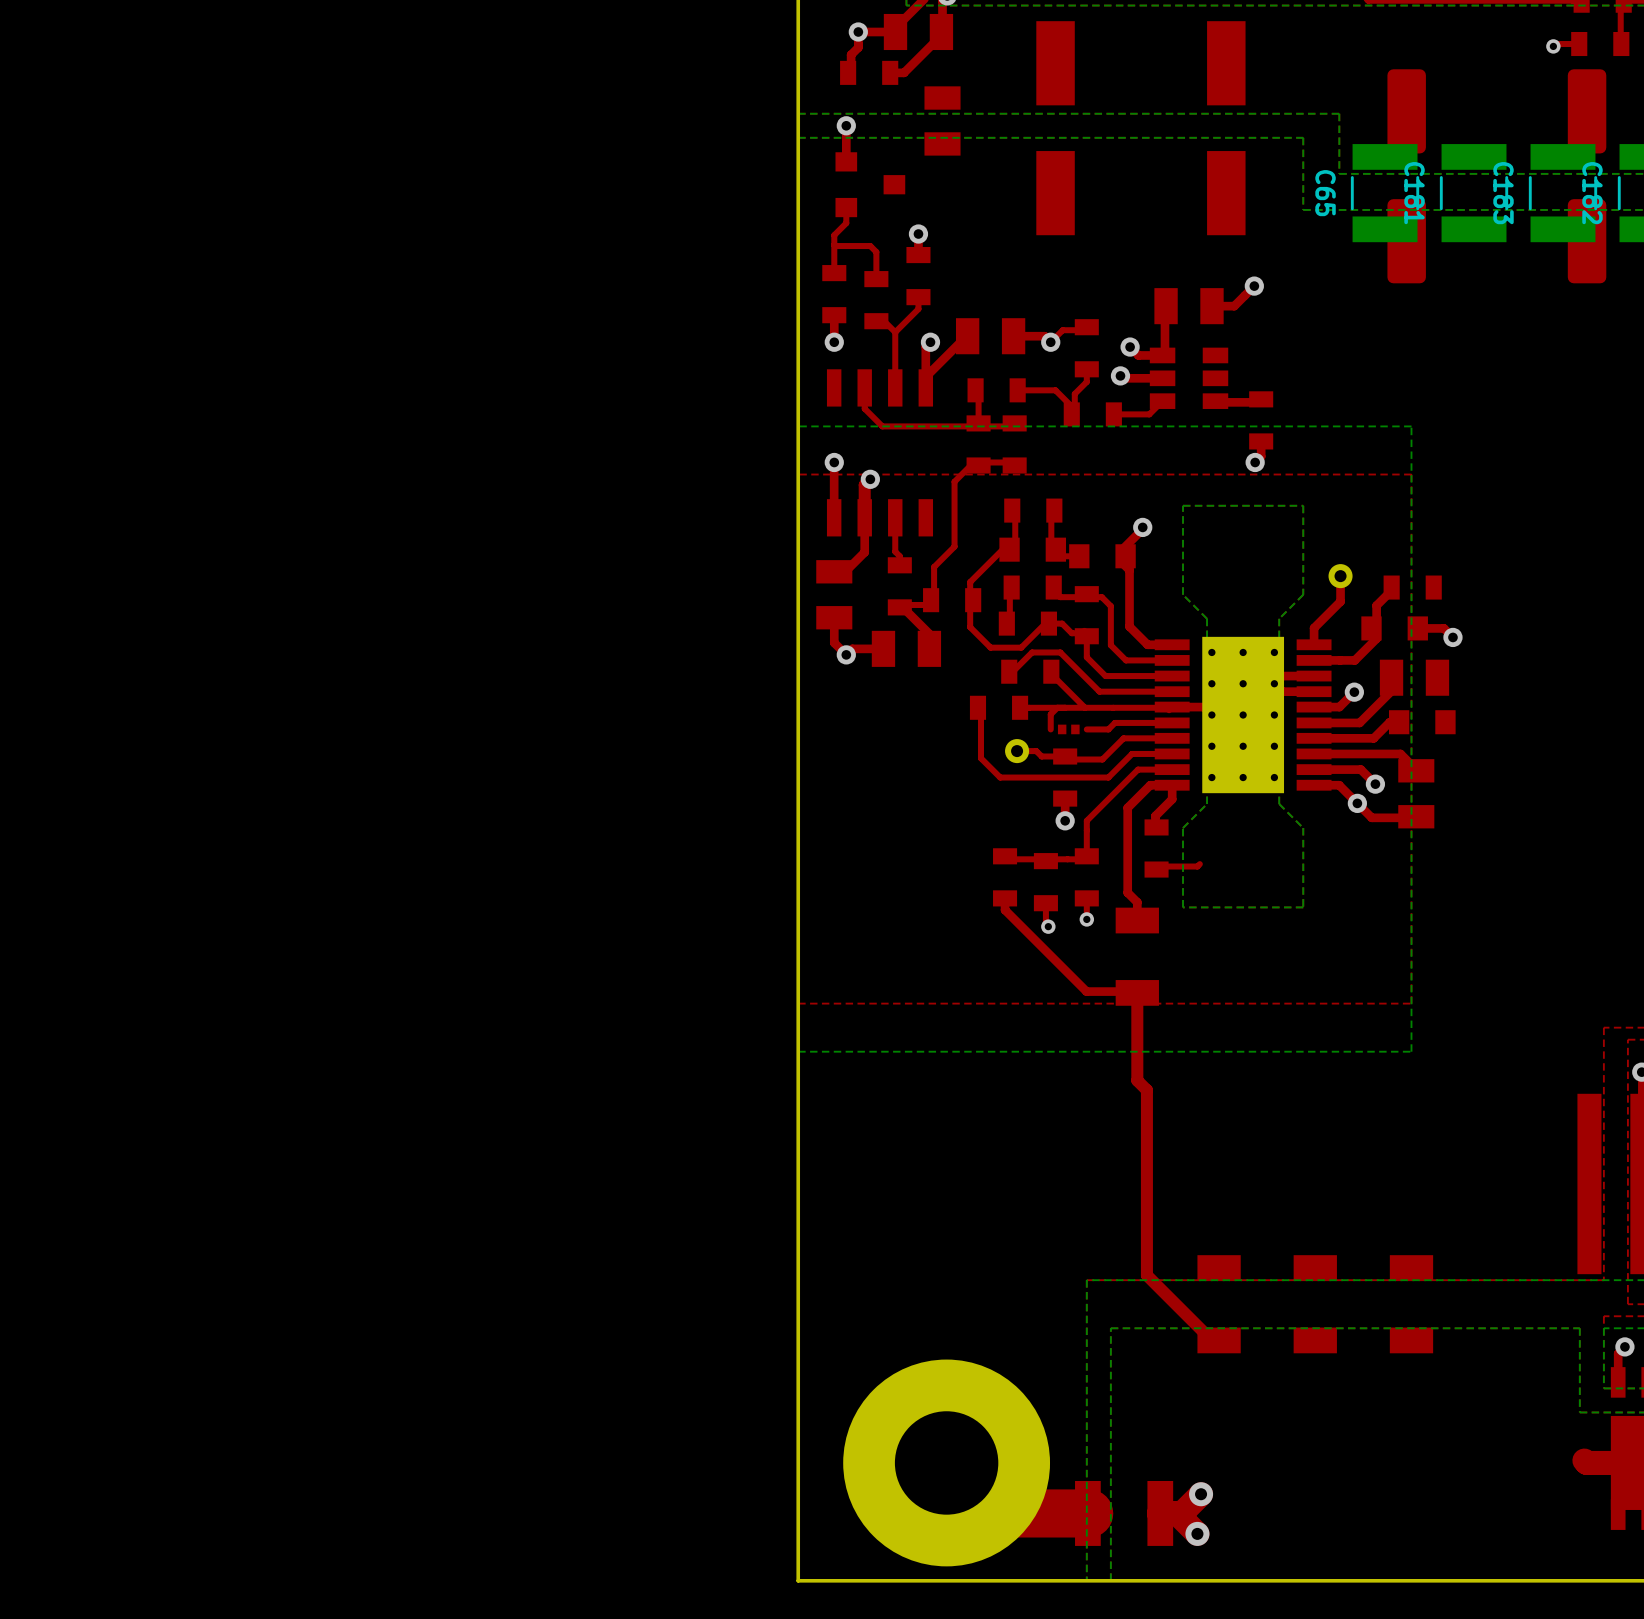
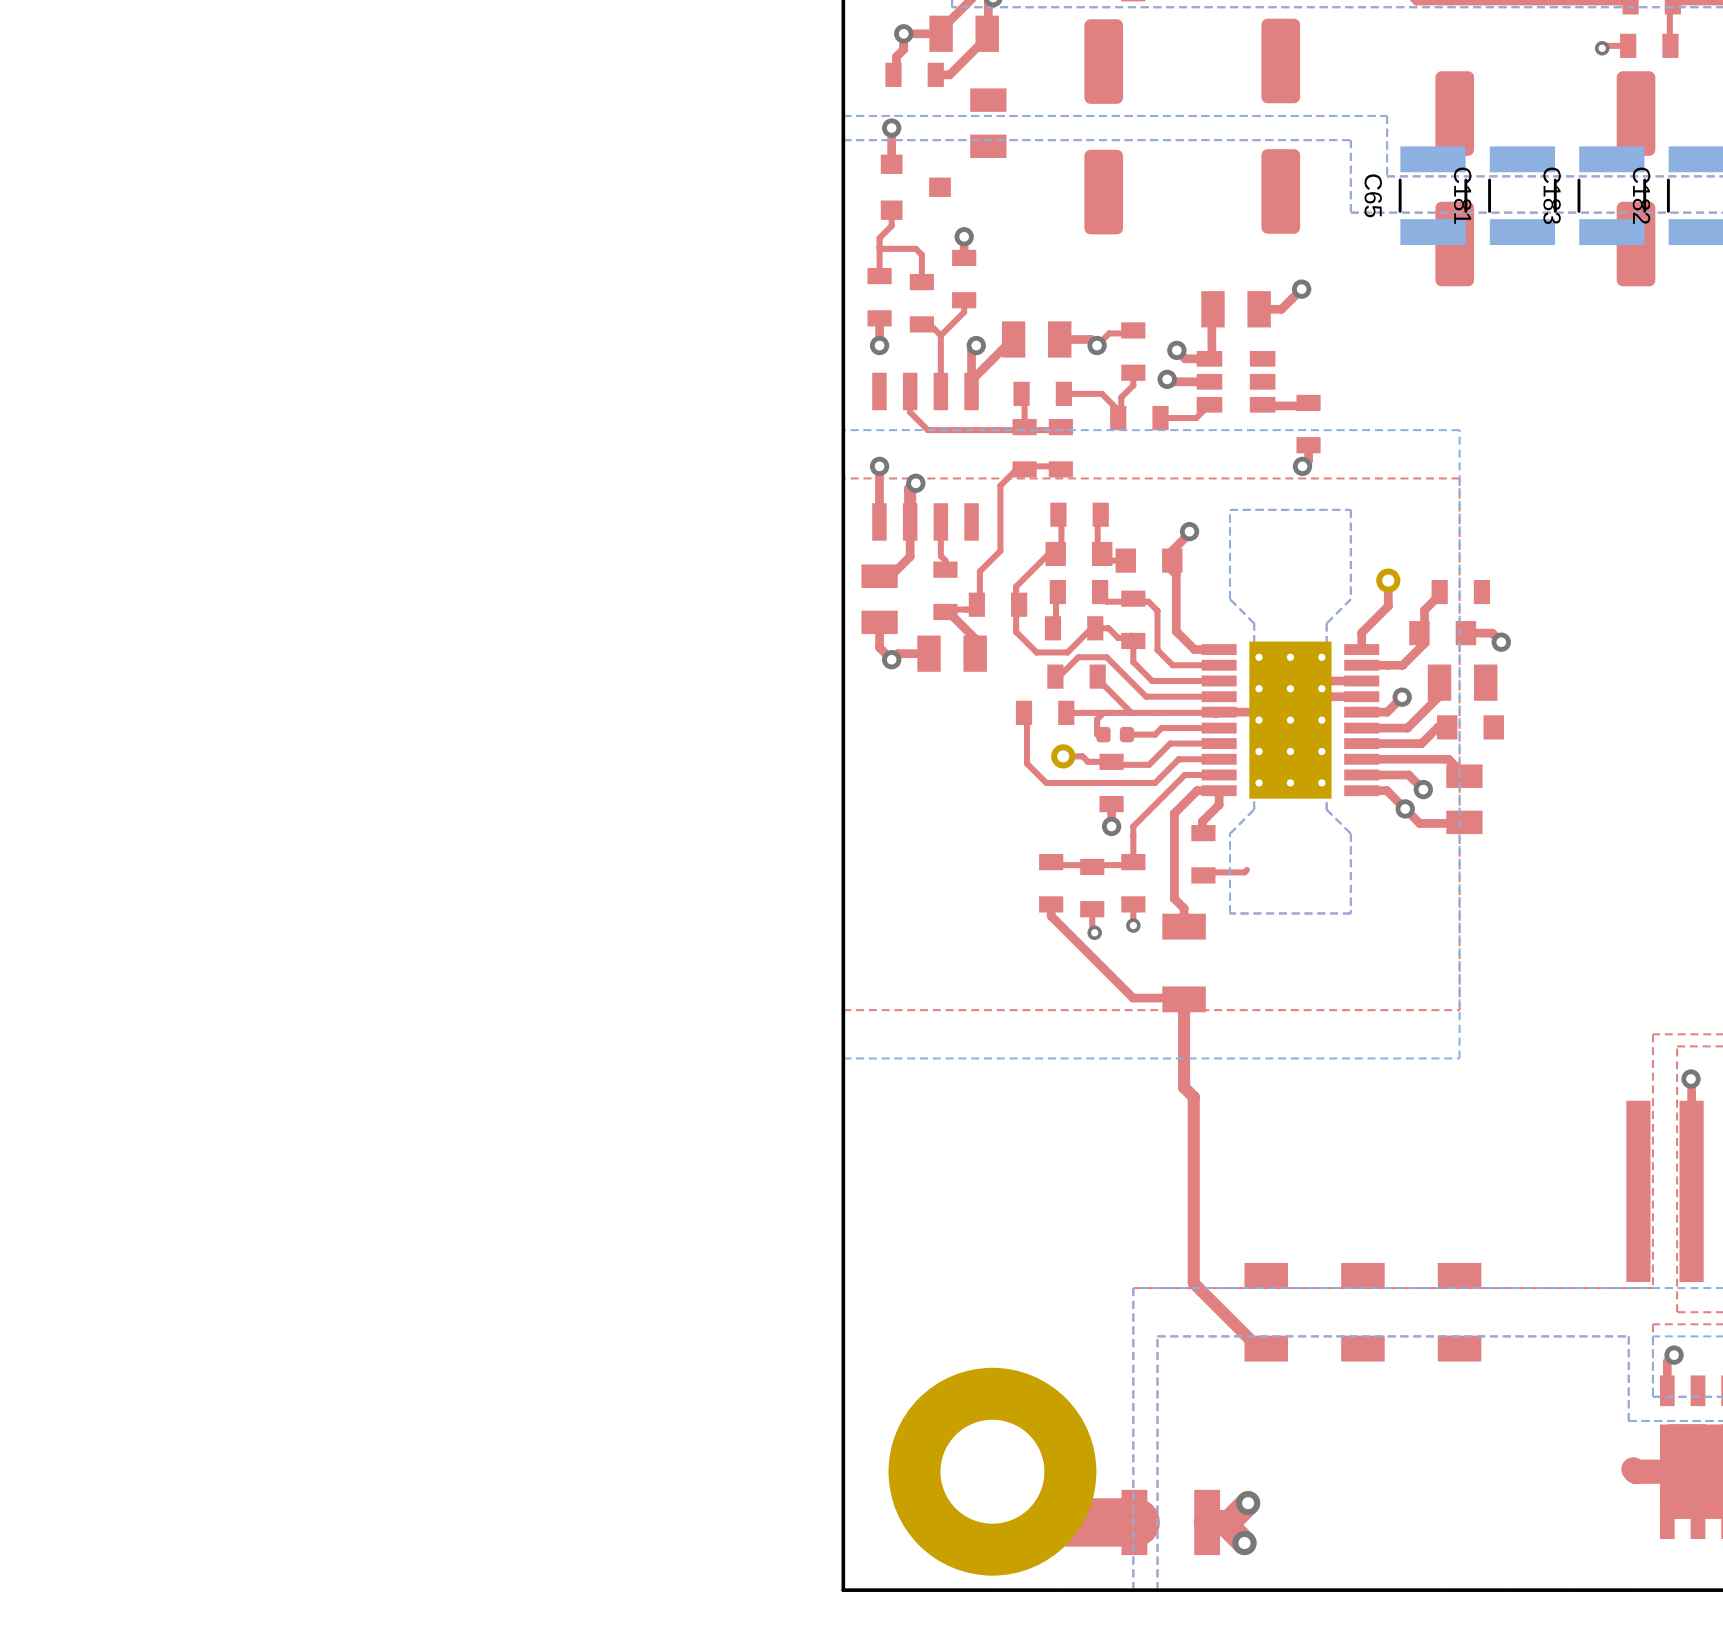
part footprint: [1036, 21, 1075, 236] -> [1084, 19, 1124, 235]
part footprint: [1207, 21, 1246, 236] -> [1261, 18, 1301, 234]
part footprint: [1057, 724, 1080, 735] -> [1096, 726, 1135, 743]

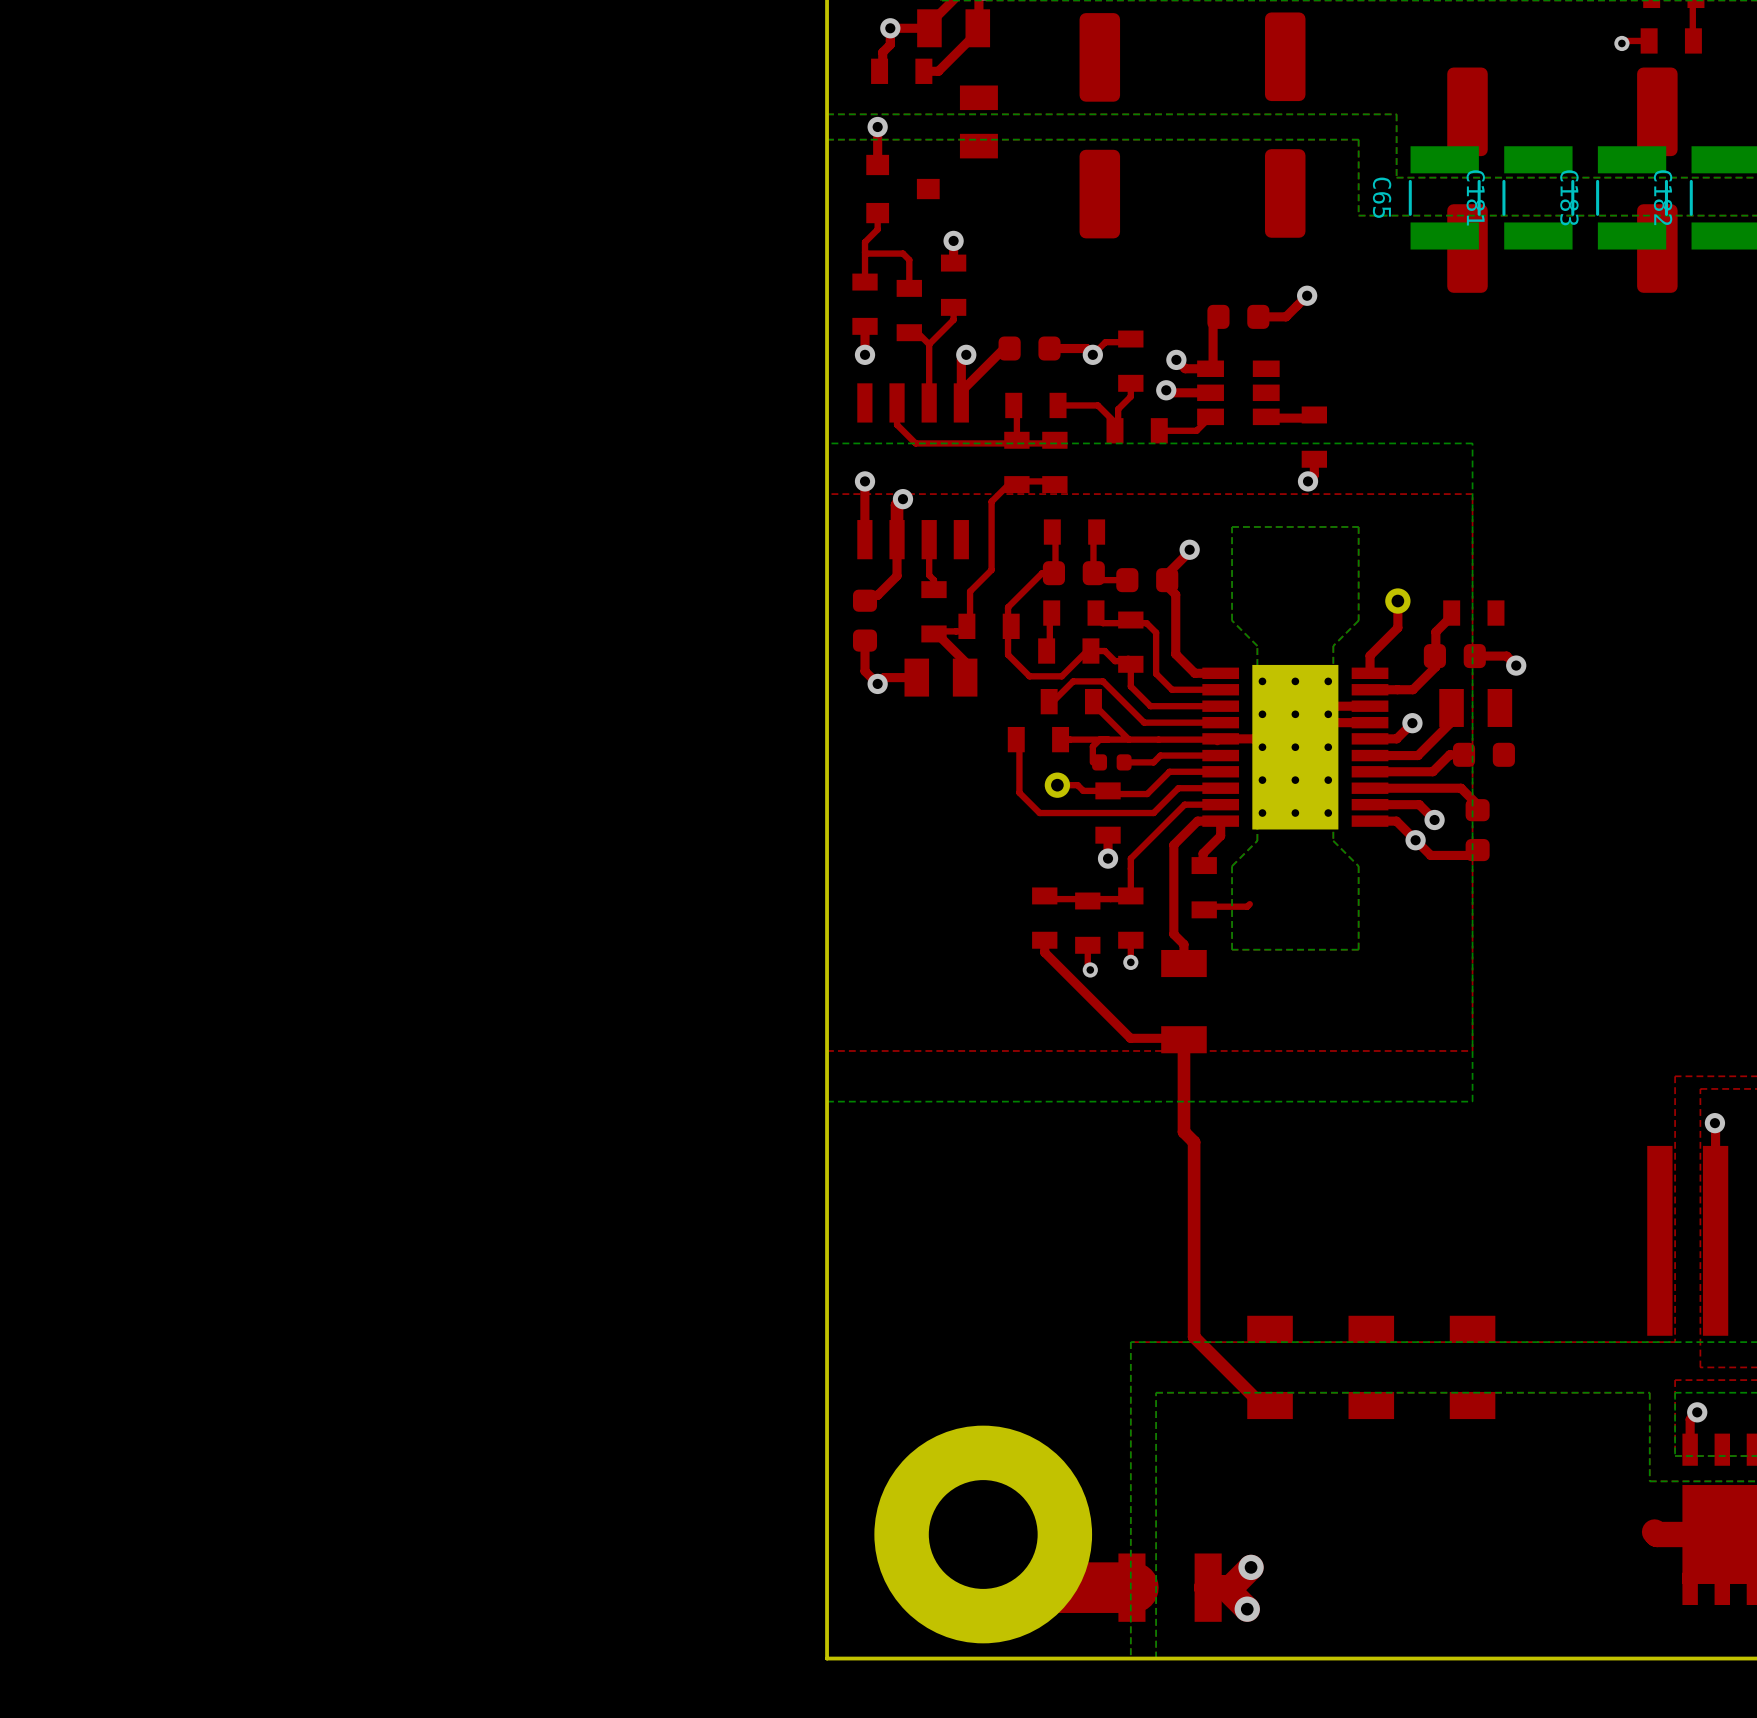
part footprint: [1201, 291, 1271, 328] -> [1207, 304, 1270, 329]
part footprint: [1001, 321, 1072, 358] -> [998, 336, 1061, 361]
part footprint: [1045, 541, 1113, 567] -> [1042, 561, 1105, 586]
part footprint: [1115, 548, 1183, 573] -> [1116, 568, 1179, 593]
part footprint: [861, 564, 898, 635] -> [852, 589, 878, 652]
part footprint: [1409, 621, 1477, 646] -> [1423, 644, 1486, 669]
part footprint: [1437, 715, 1504, 740] -> [1452, 742, 1515, 767]
part footprint: [1446, 764, 1483, 835] -> [1465, 799, 1490, 862]

